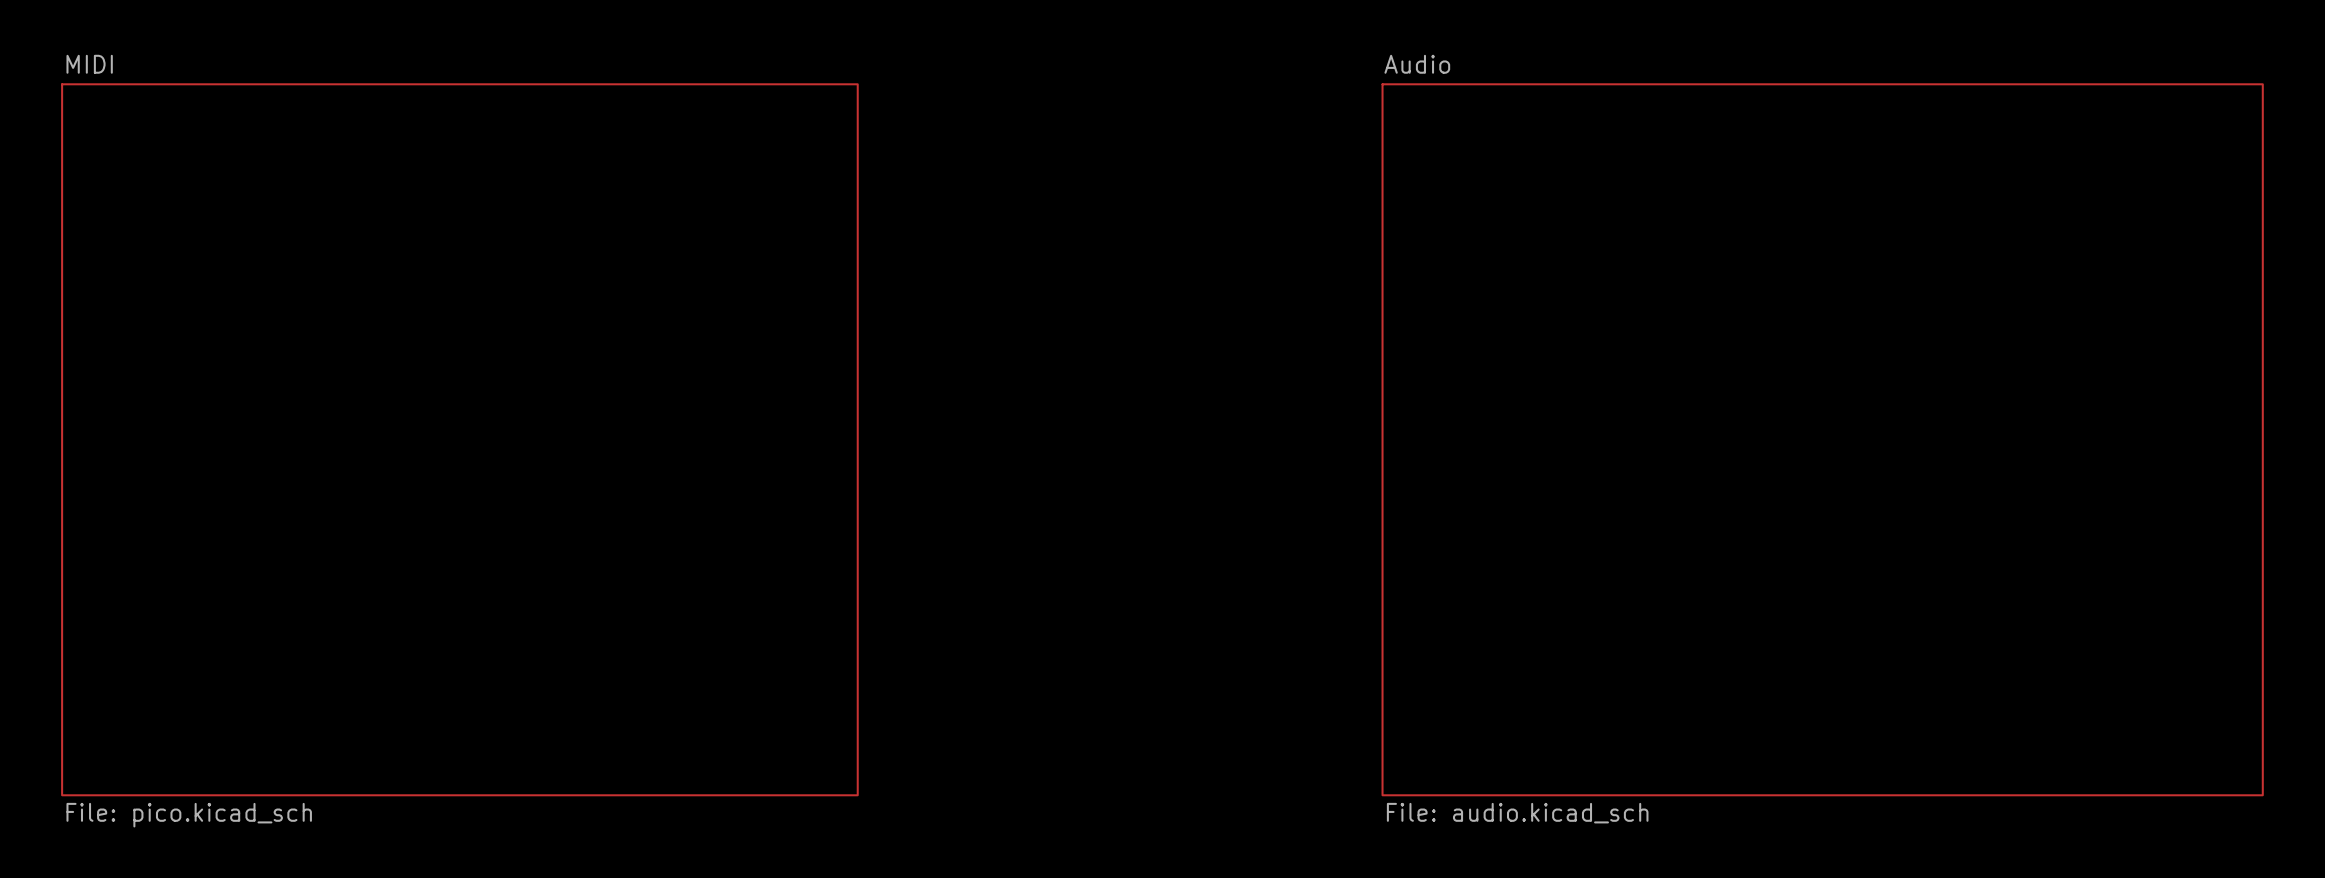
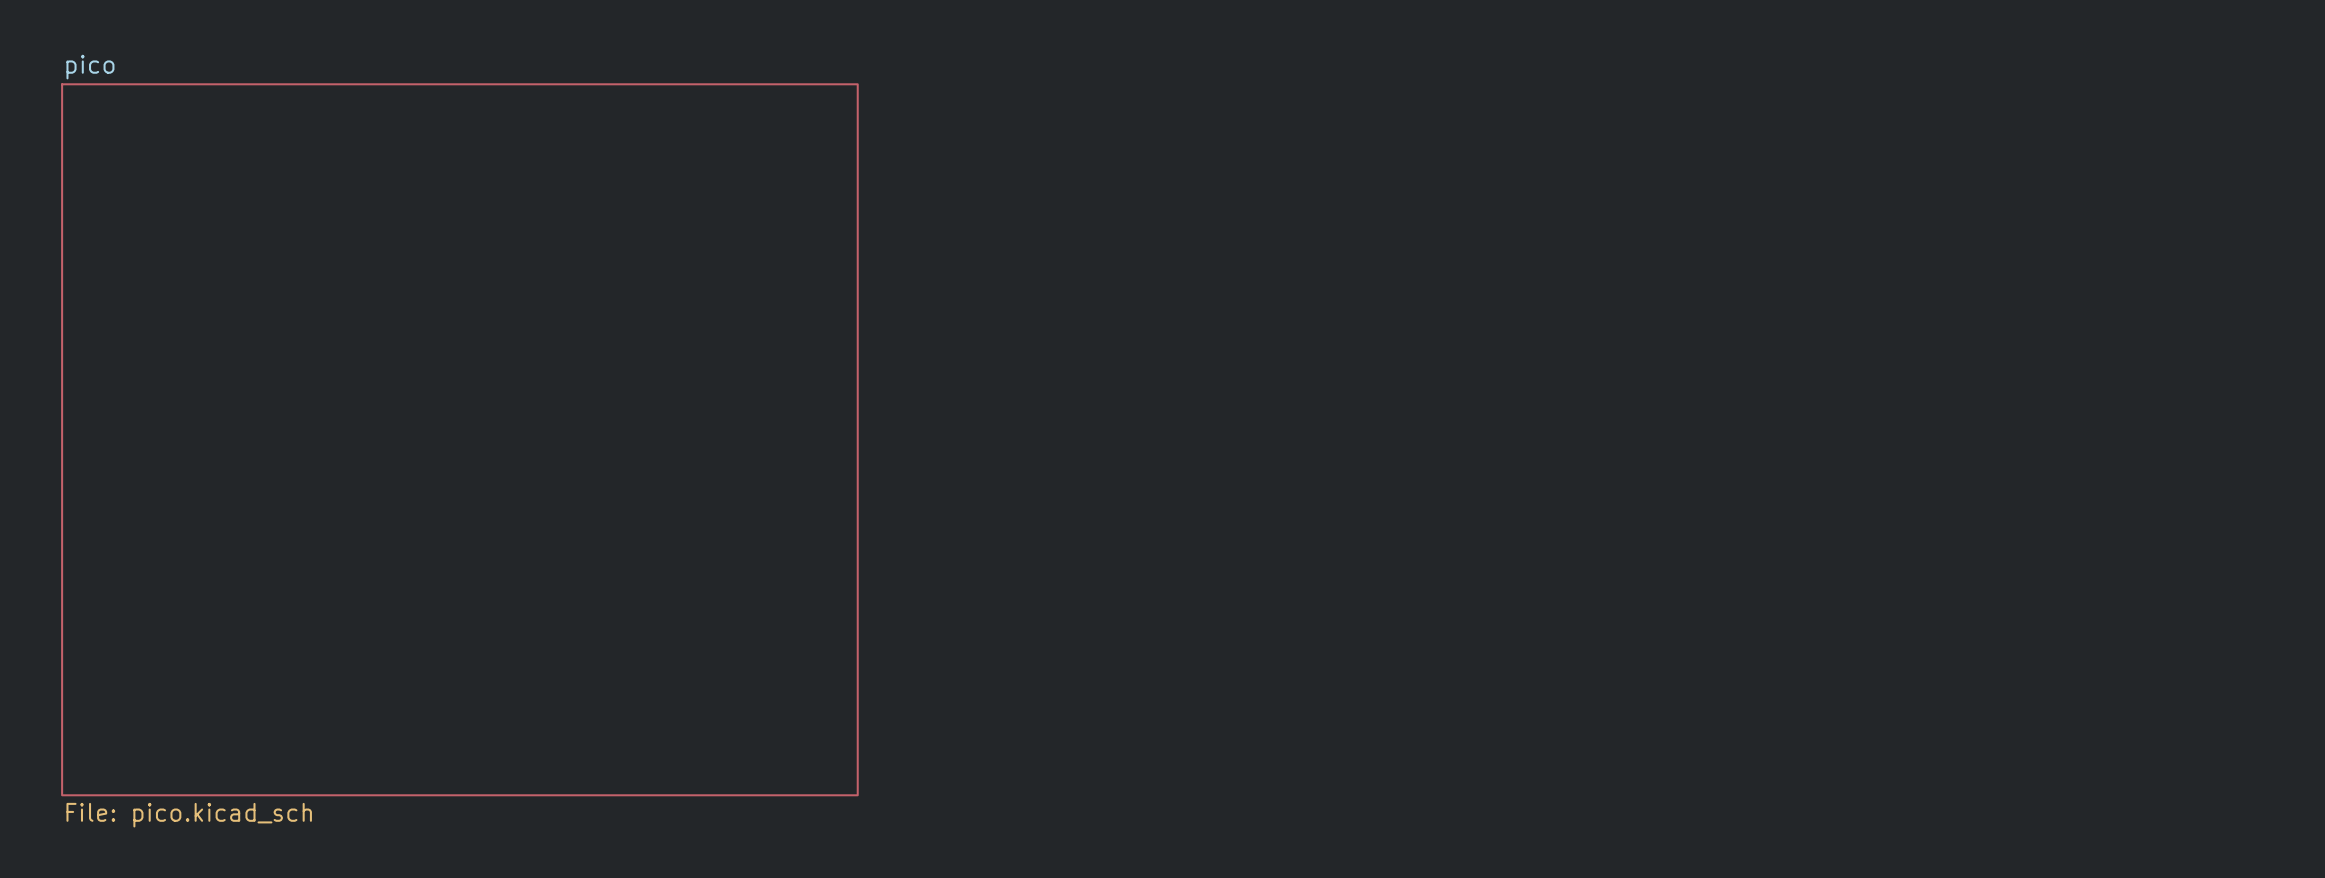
sheet MIDI name: MIDI (89, 64) -> pico (90, 67)
sheet Audio: File: audio.kicad_sch (1822, 439) -> none

